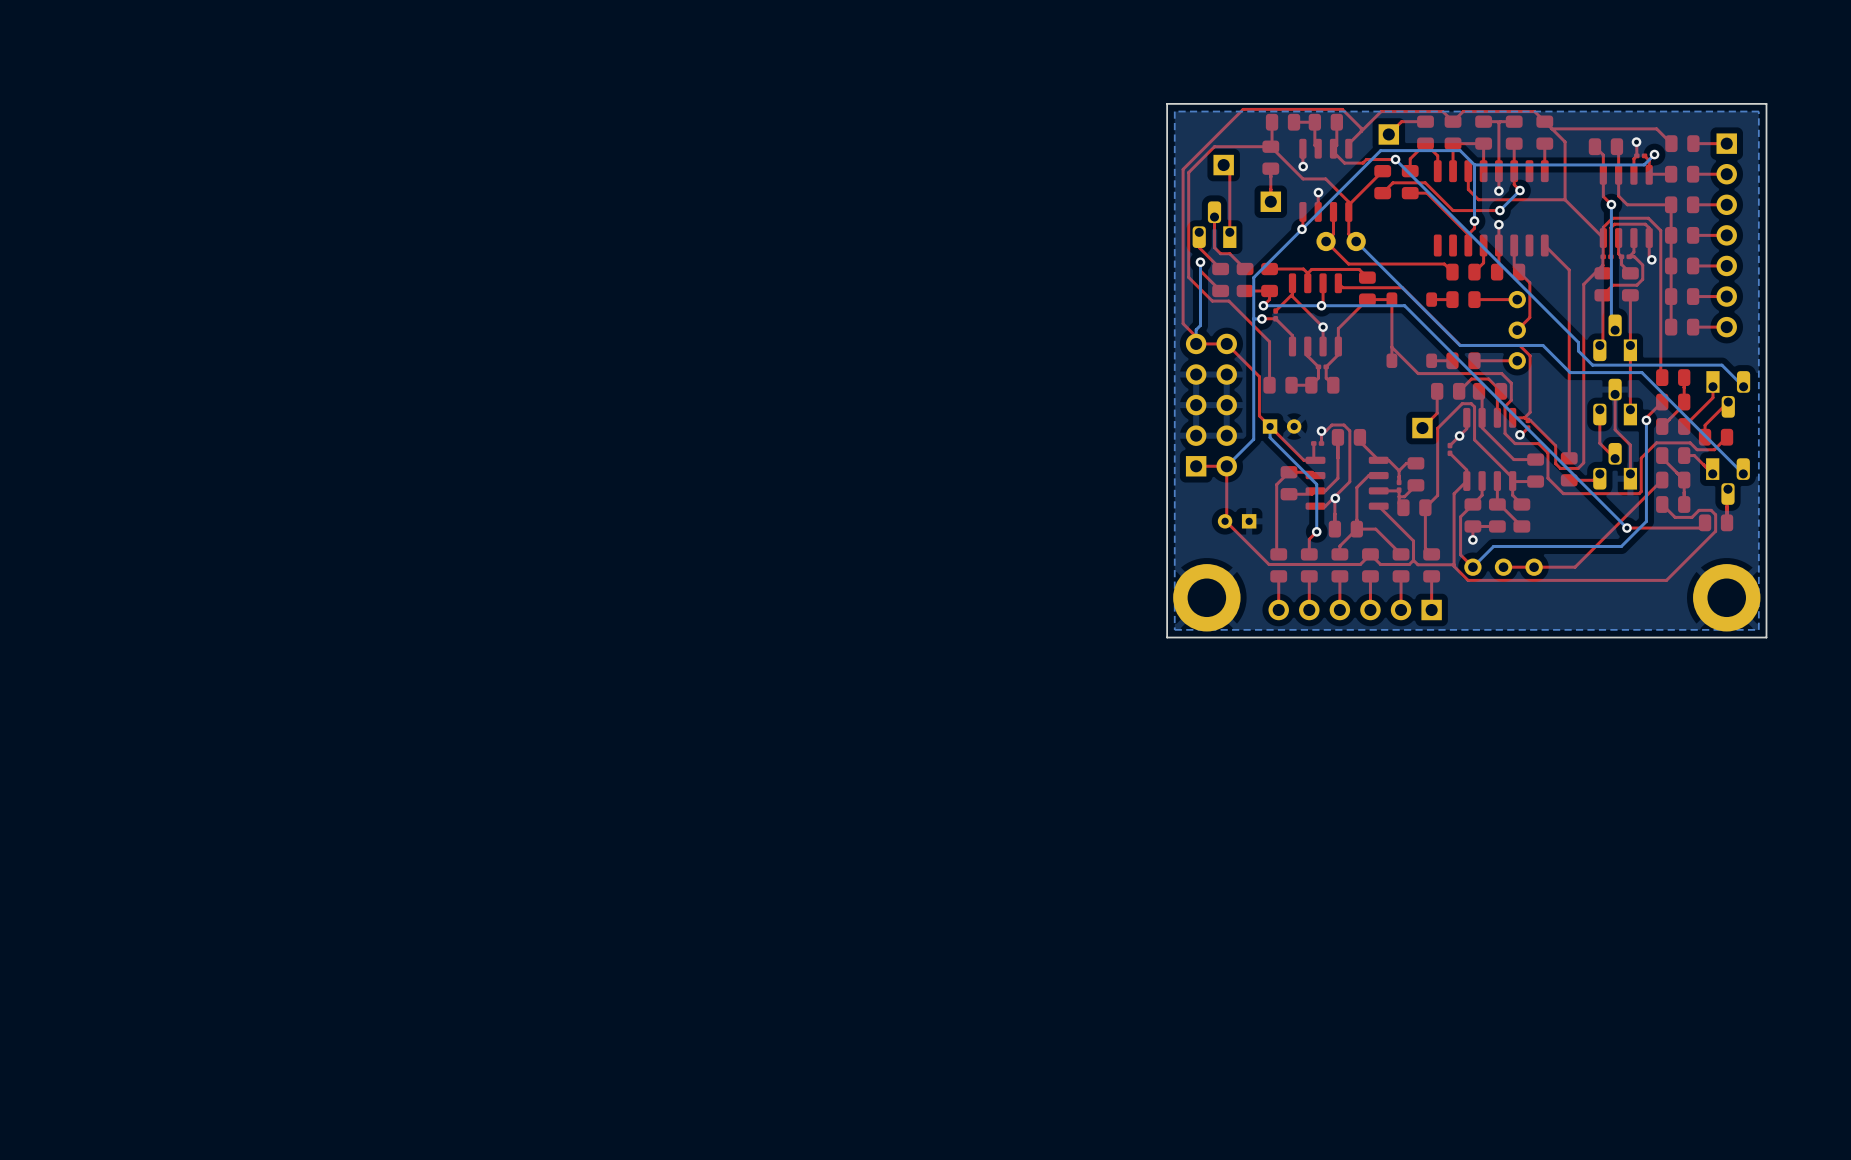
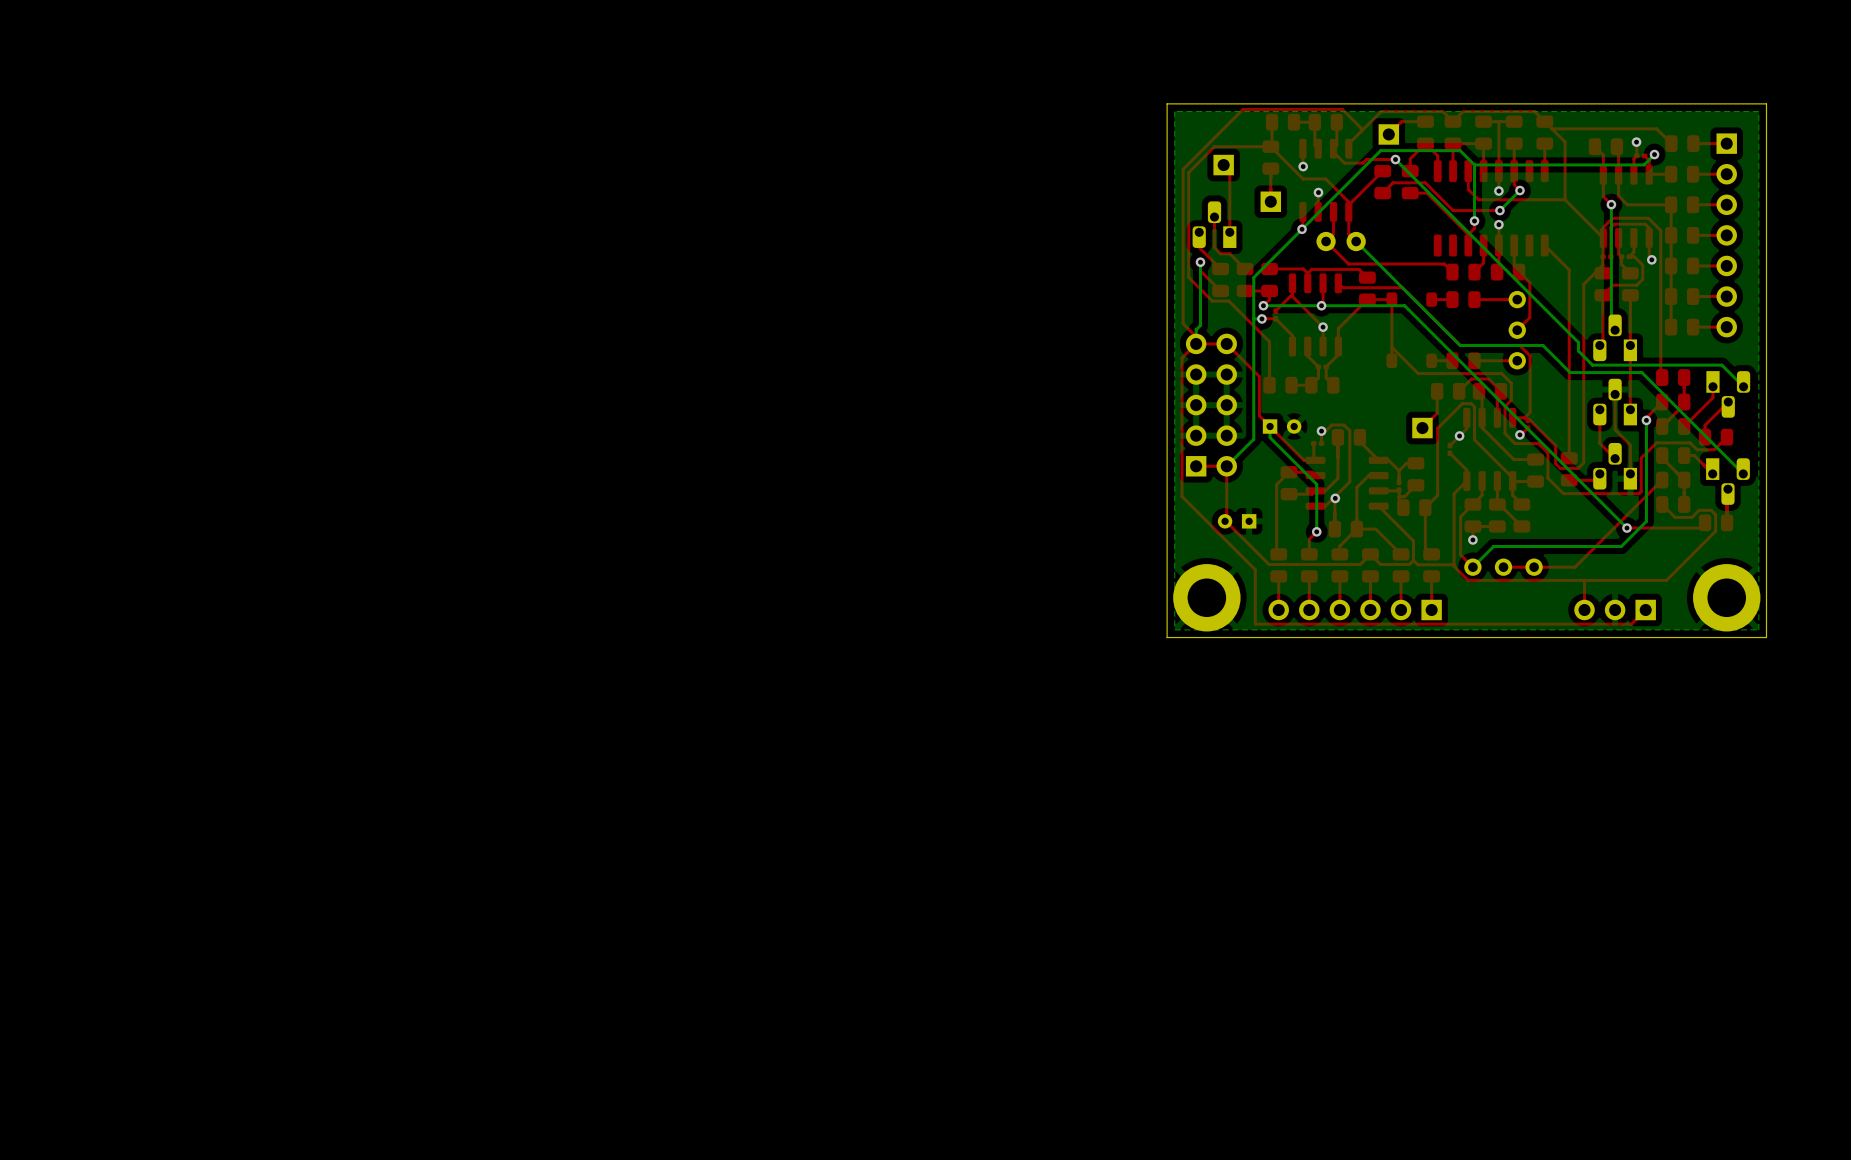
top track: none -> (1196, 343) (1182, 358) (1182, 496) (1255, 569) (1255, 624) (1631, 624) (1645, 610)
top track: none -> (1584, 580) (1584, 610)
part: none -> (1615, 610)

